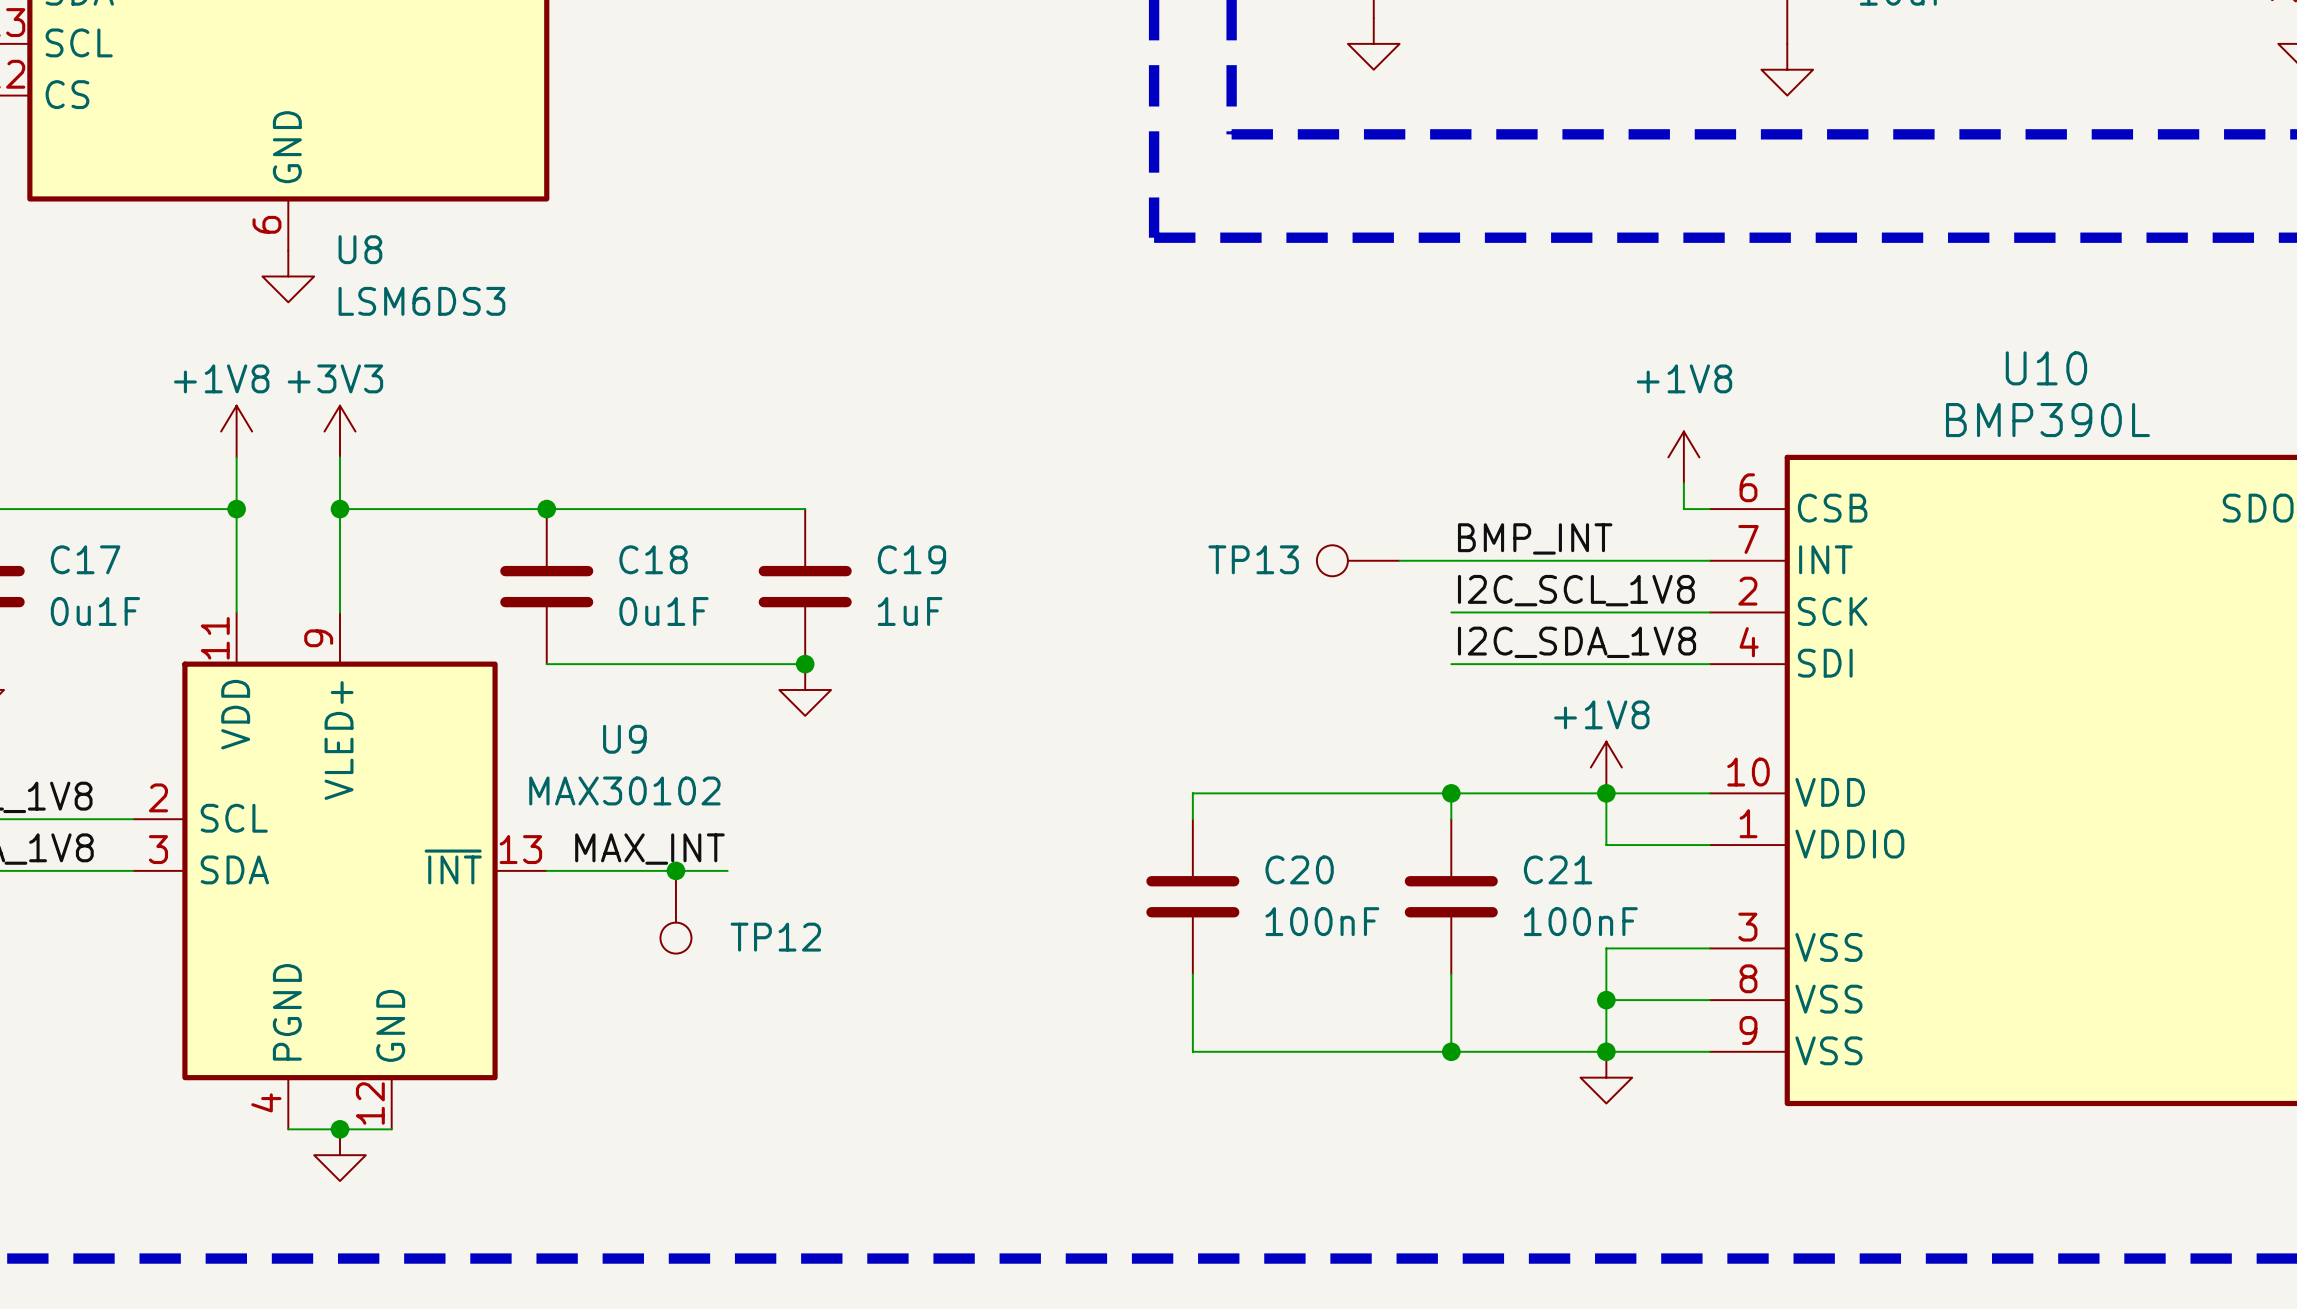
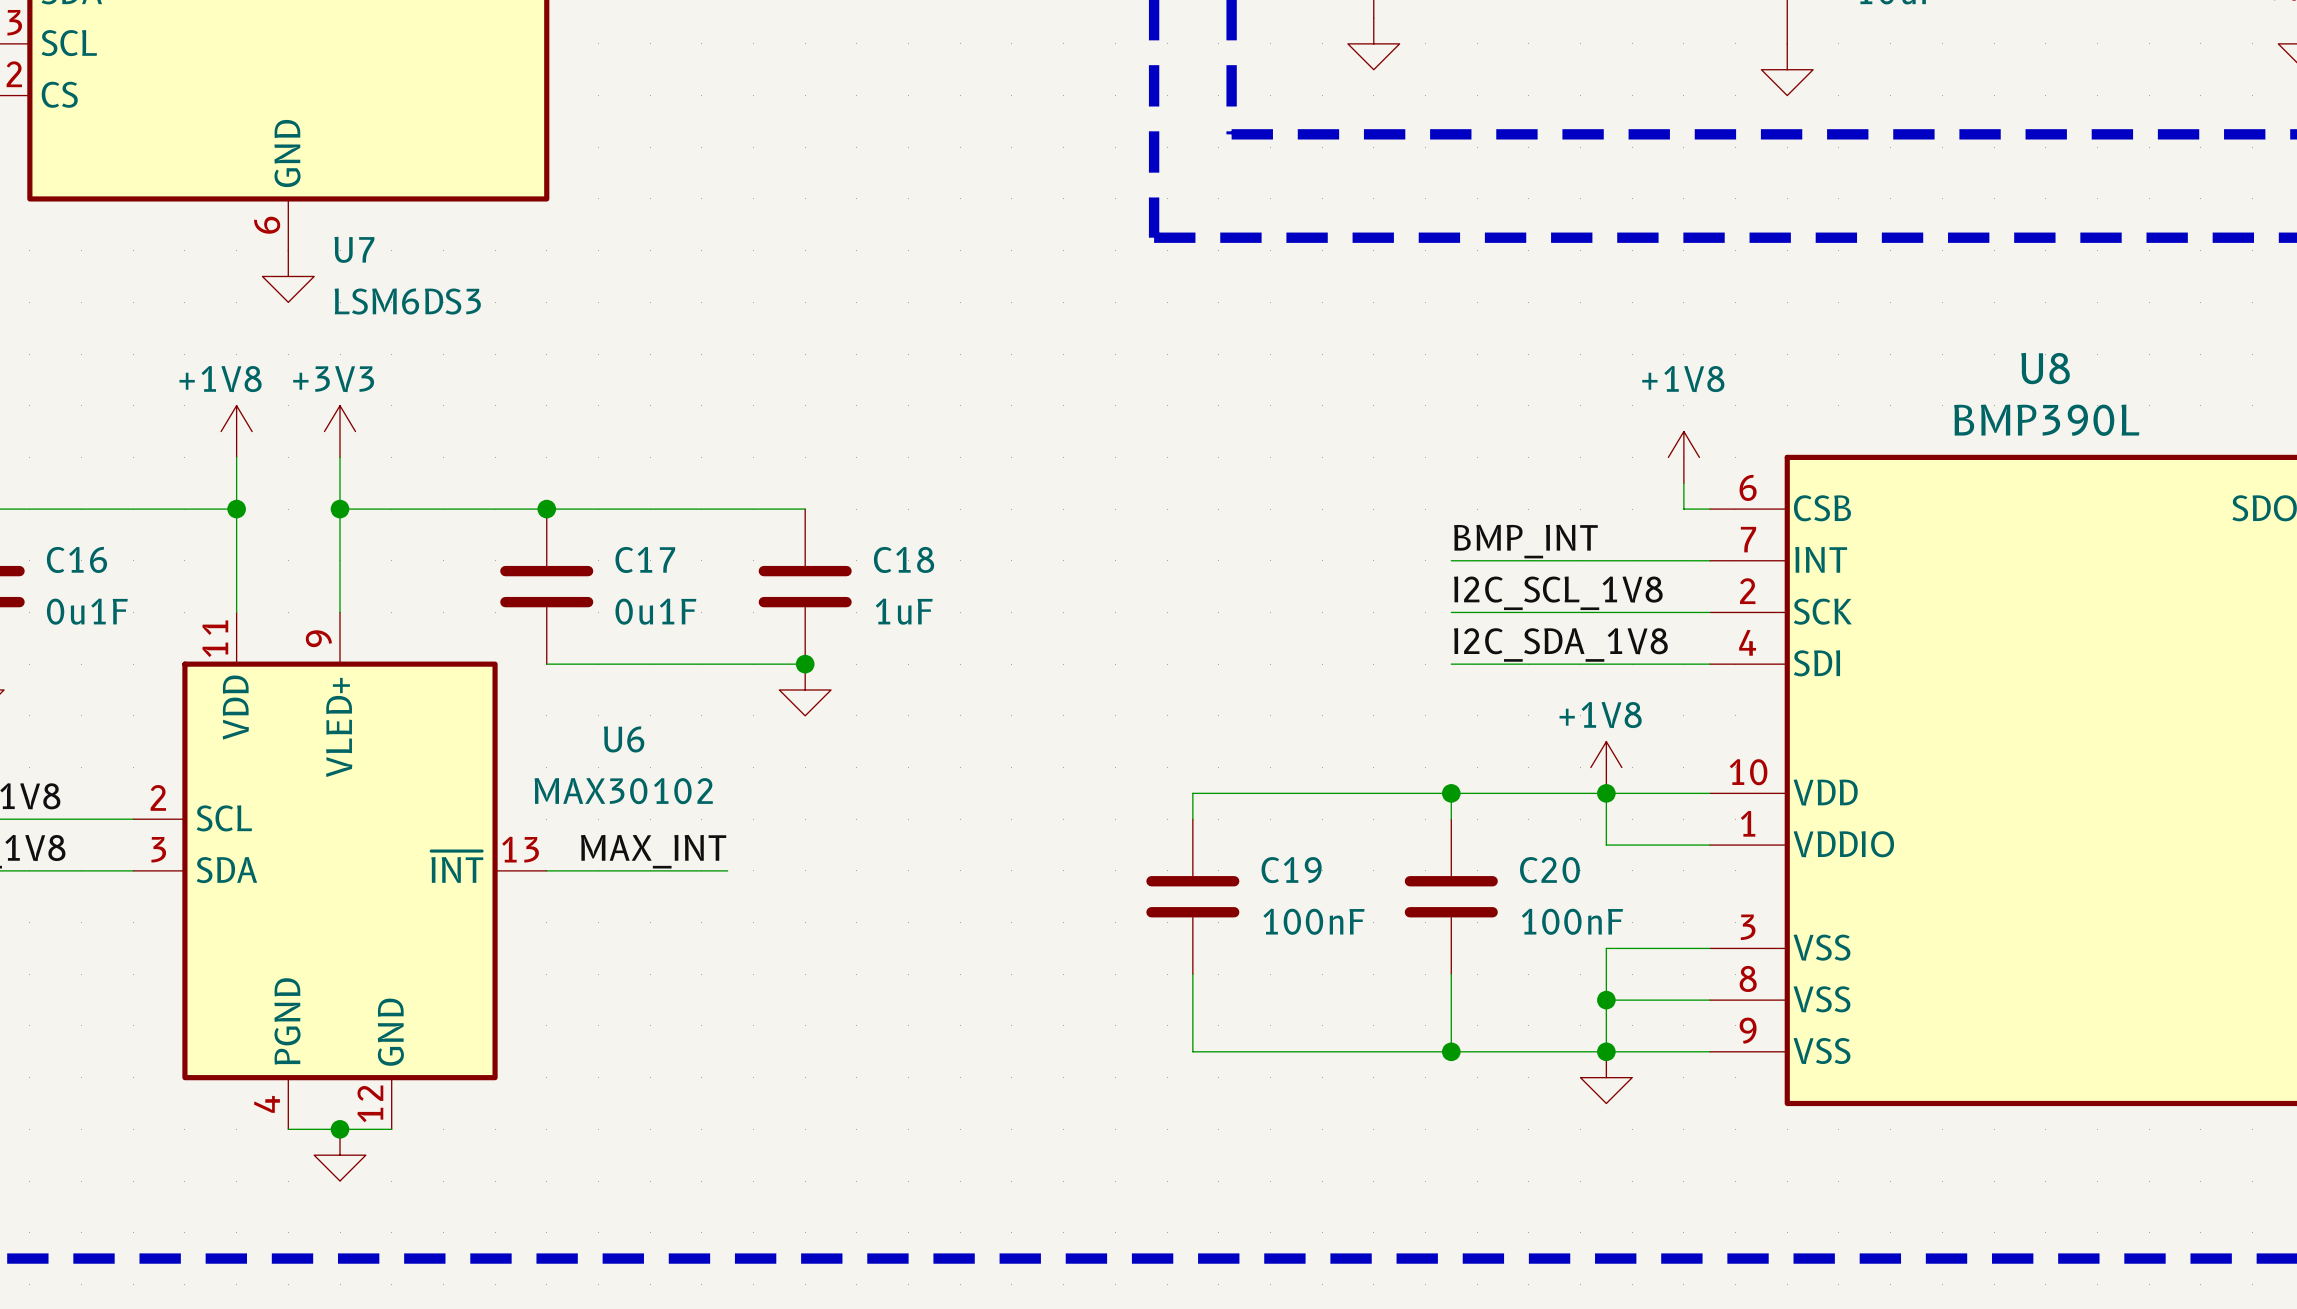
U8 name: U8 (360, 249) -> U7 (354, 249)
U10 name: U10 (2046, 368) -> U8 (2045, 368)
C17 name: C17 (85, 559) -> C16 (76, 559)
C18 name: C18 (653, 559) -> C17 (645, 559)
C19 name: C19 (911, 559) -> C18 (904, 559)
TP13: (1358, 560) -> none
wire: (1399, 560) (1451, 560) -> none
U9 name: U9 (624, 739) -> U6 (624, 739)
C20 name: C20 (1299, 869) -> C19 (1291, 870)
C21 name: C21 (1558, 869) -> C20 (1549, 870)
junction: (675, 870) -> none
TP12: (675, 912) -> none

